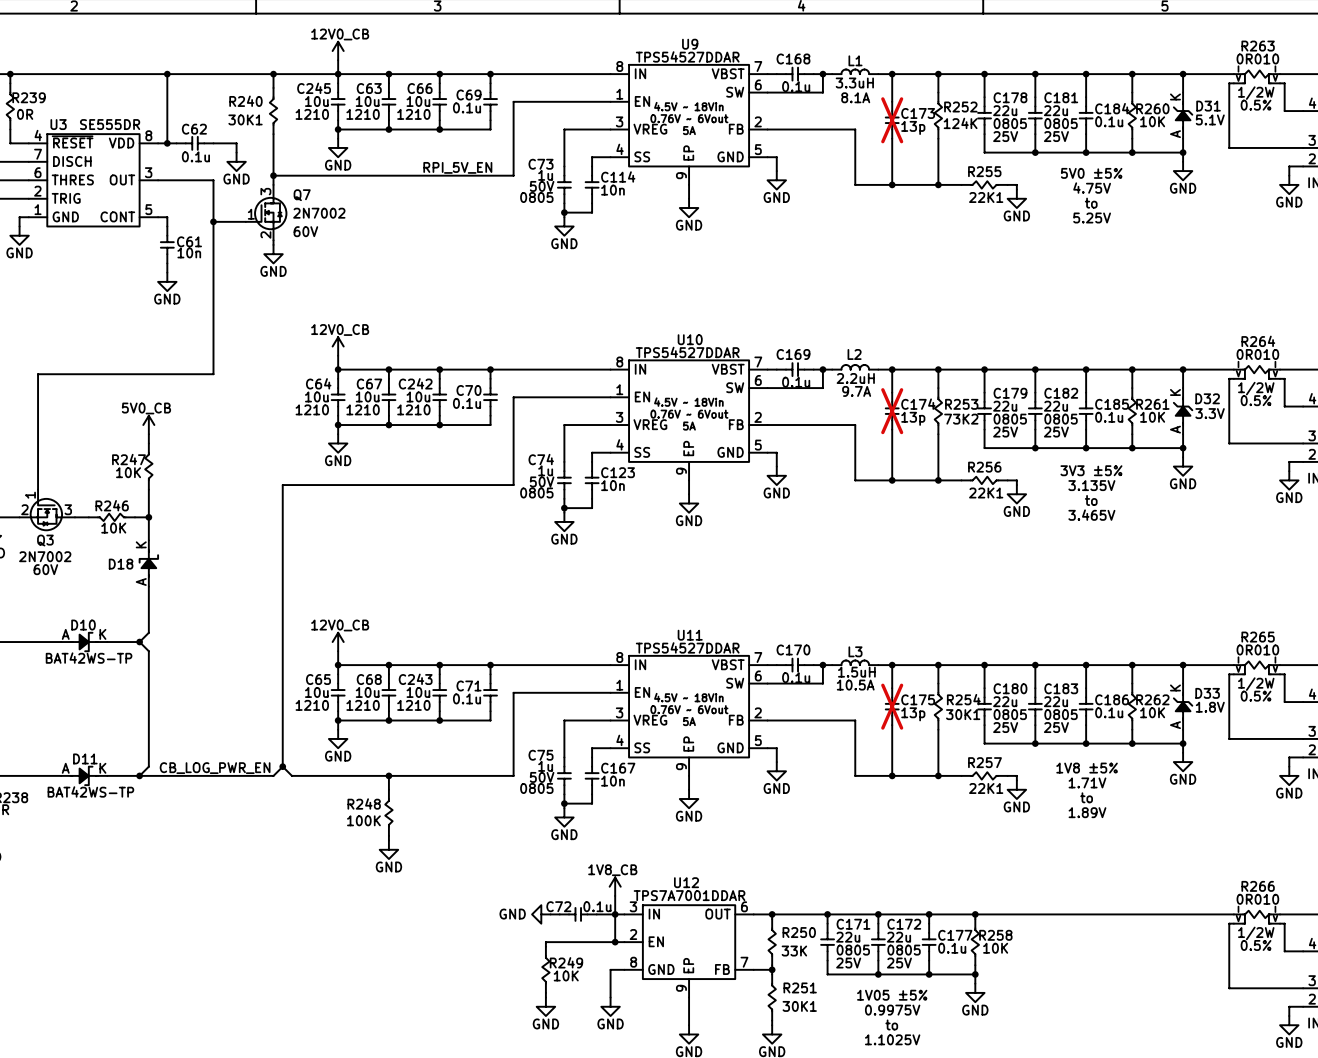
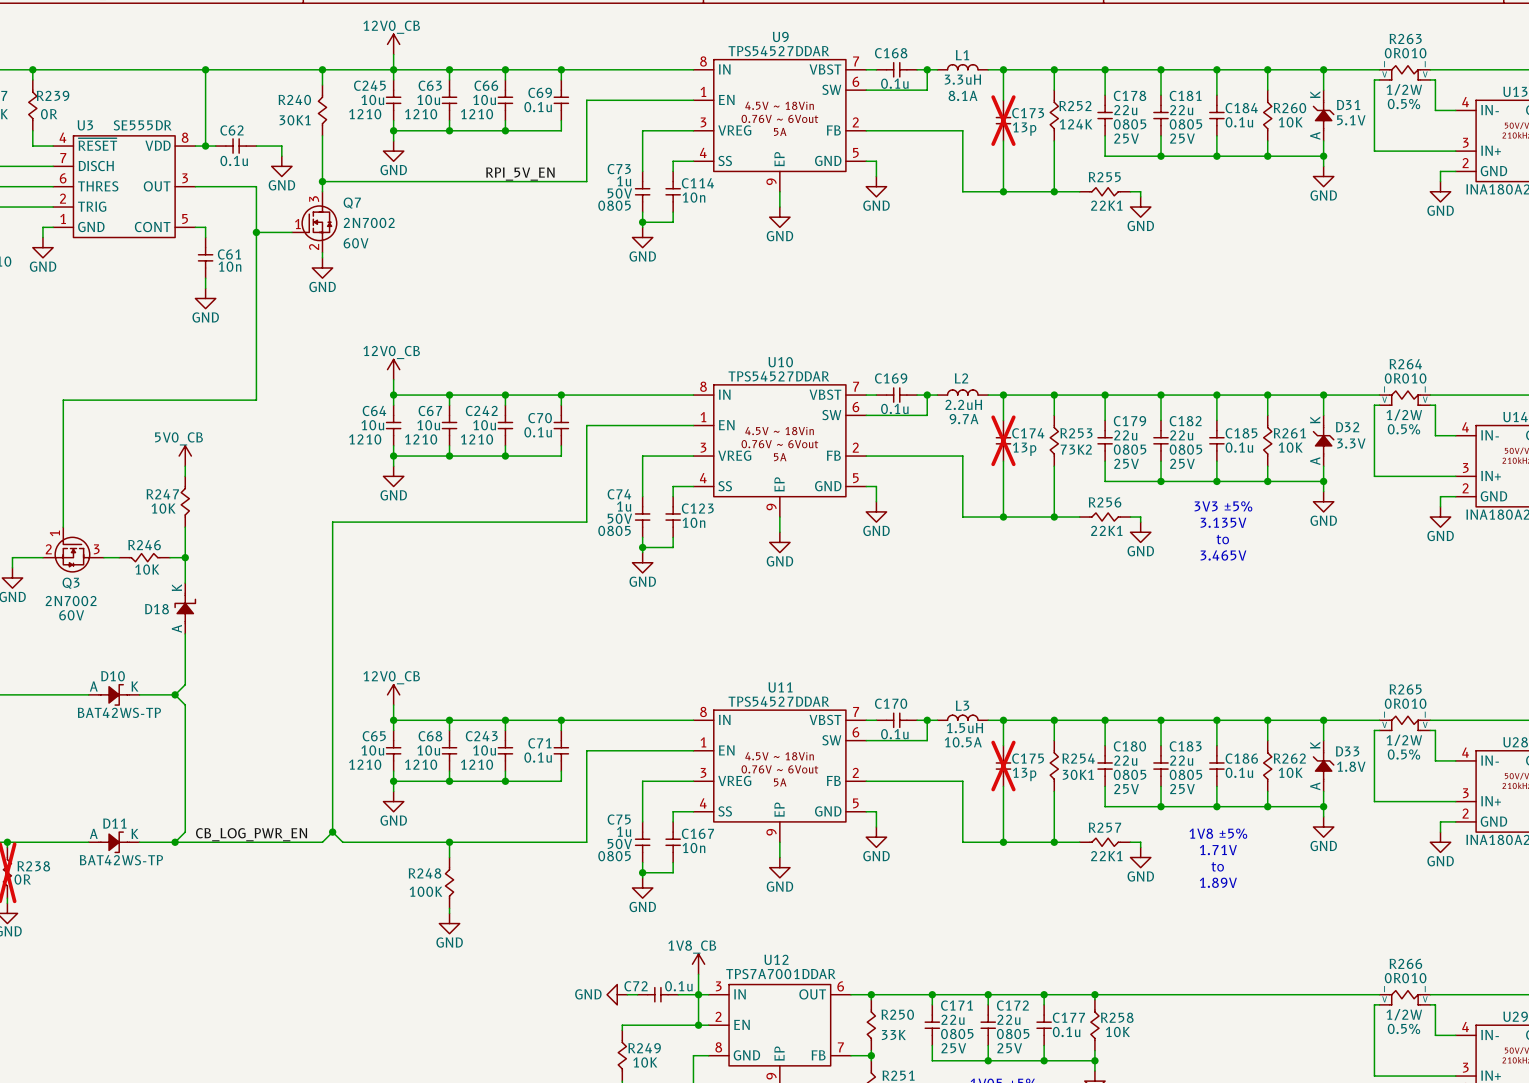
text: 5V0 ±5% (1091, 173) -> none
text: 4.75V (1092, 188) -> none
text: to (1091, 203) -> none
text: 5.25V (1092, 217) -> none

